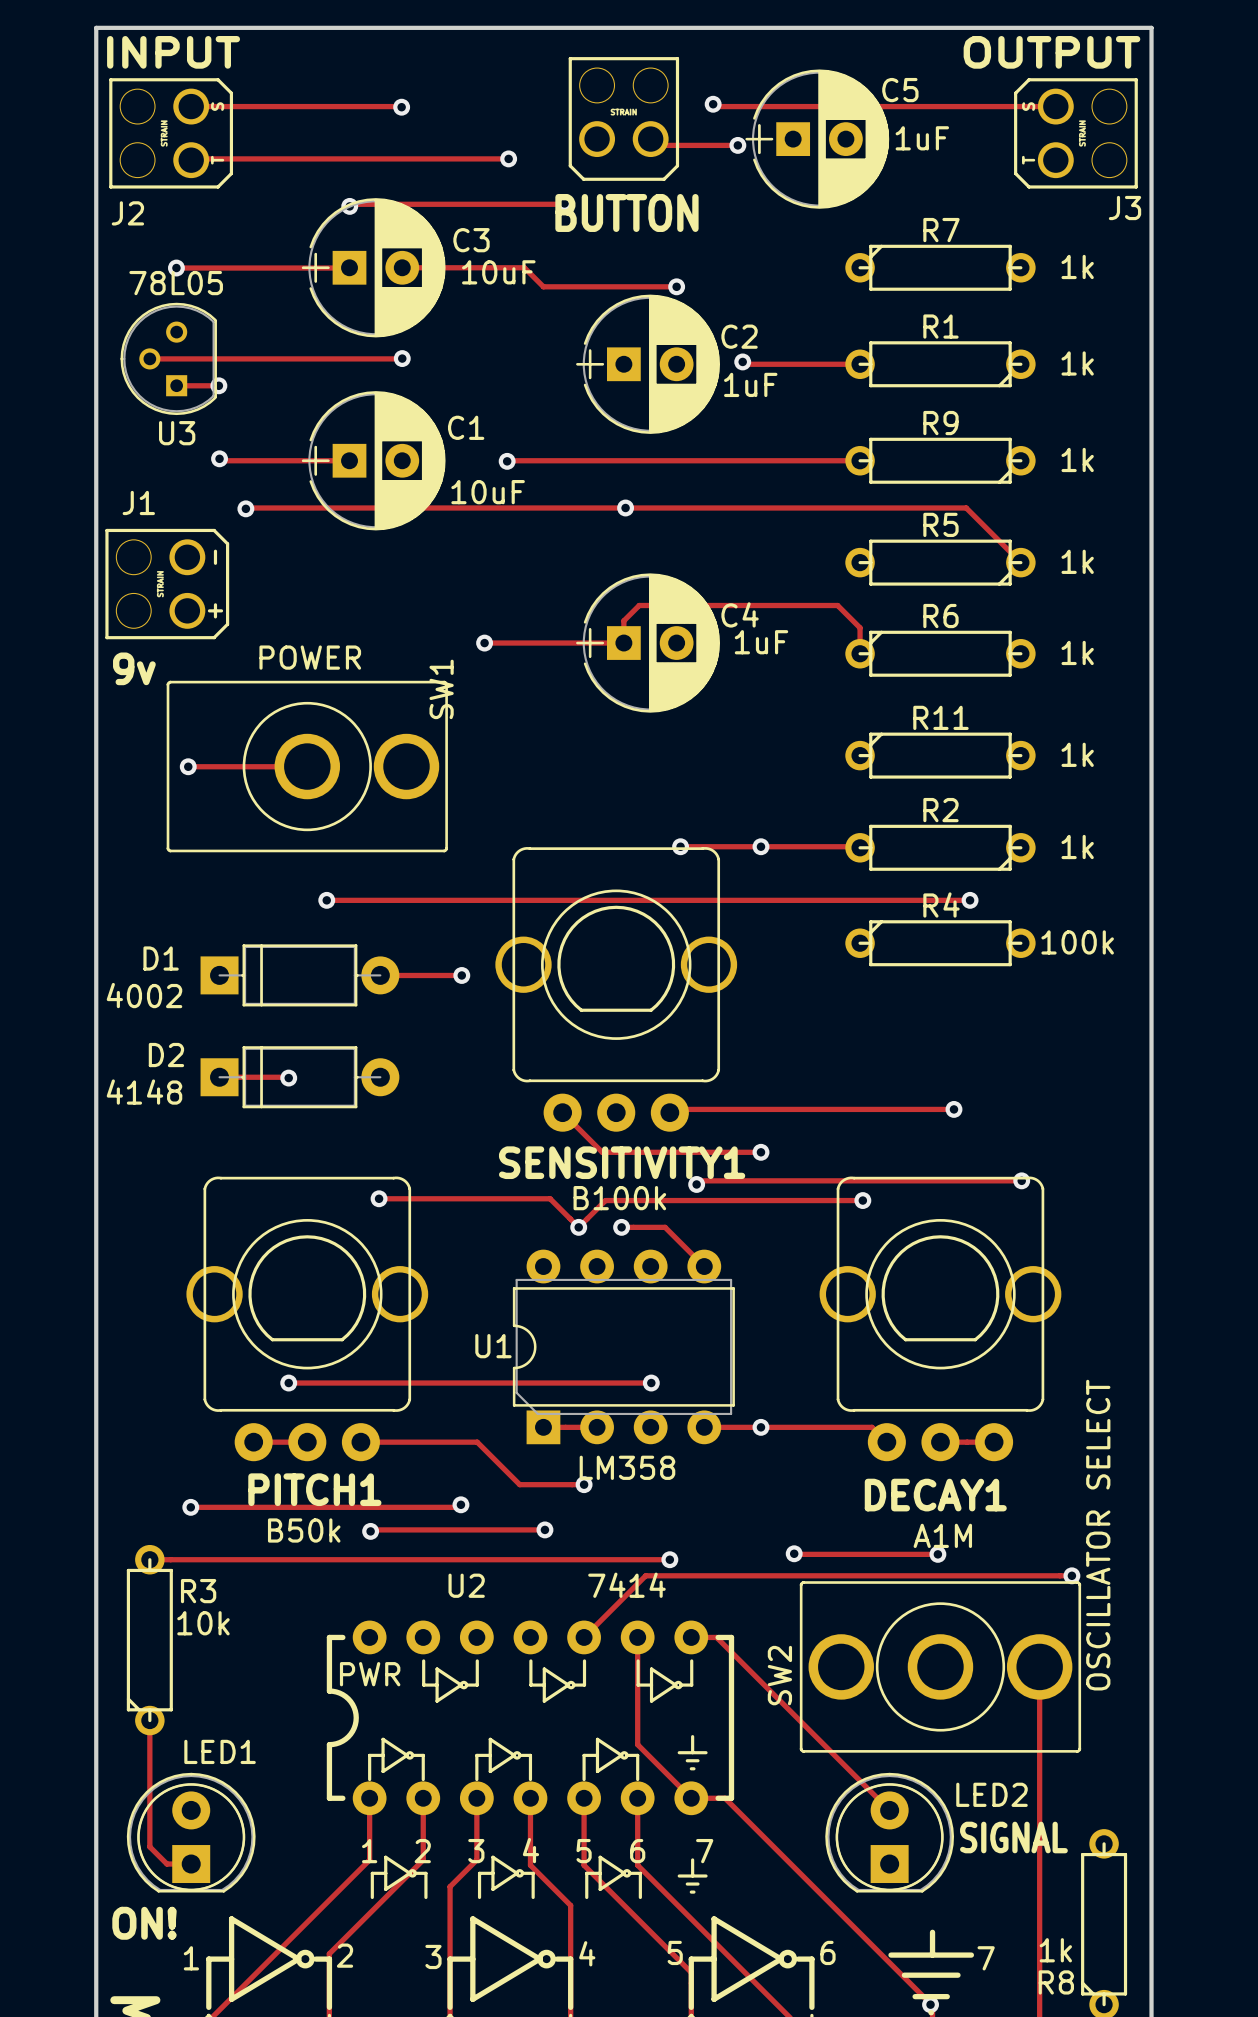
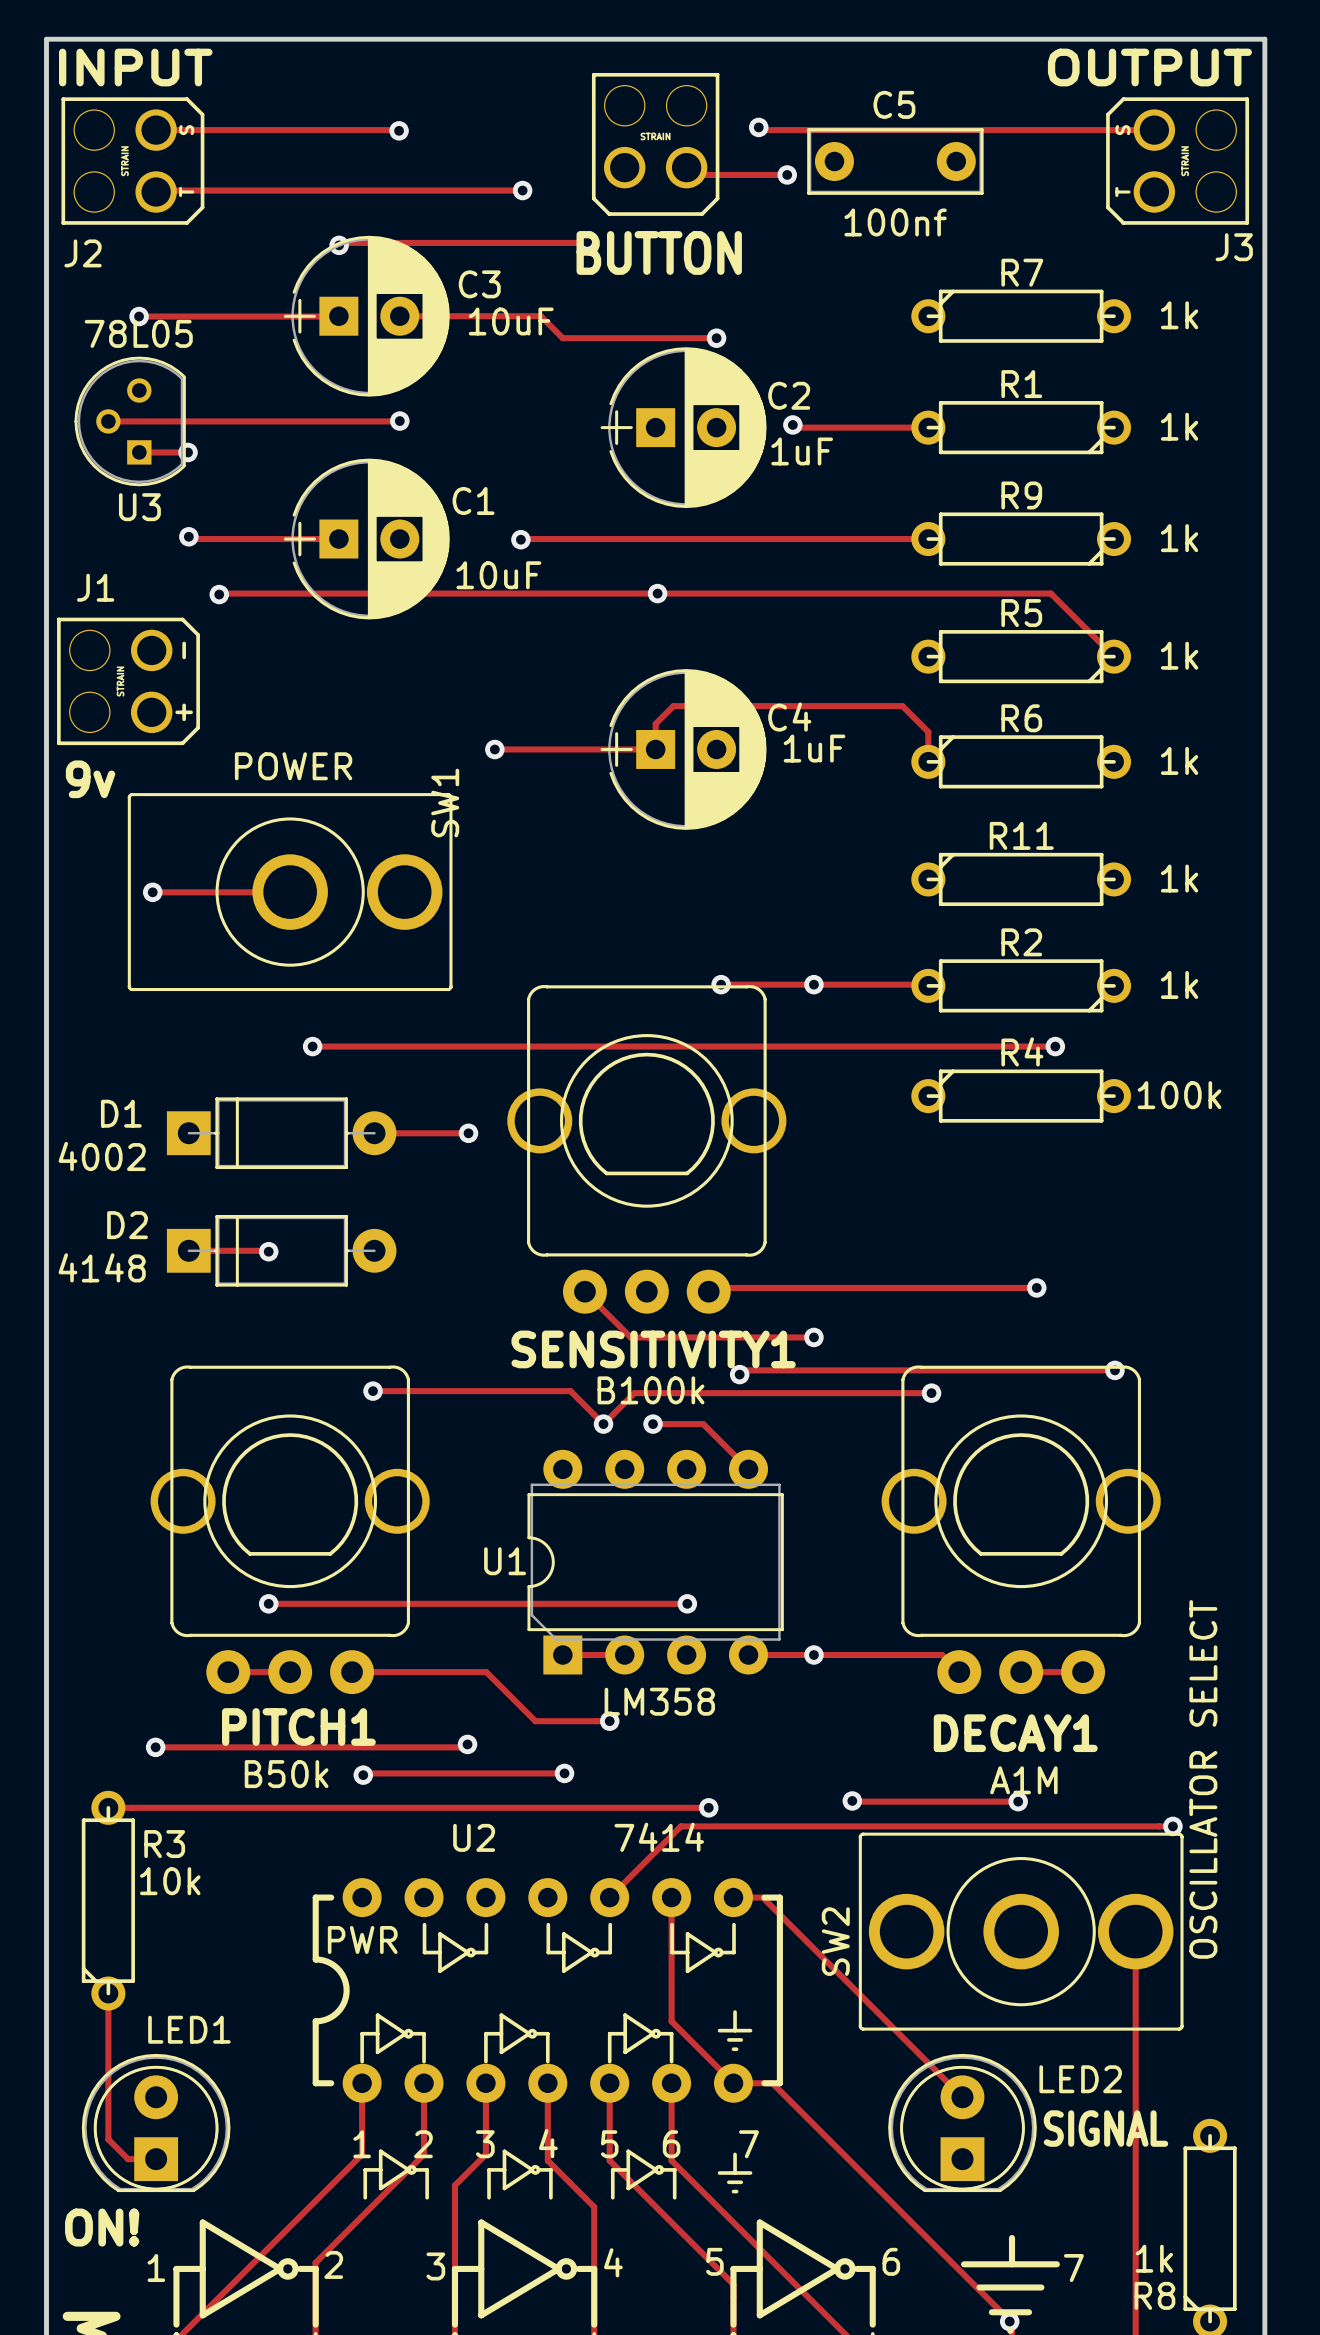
C5 footprint: [745, 69, 890, 209] -> [807, 128, 984, 195]
C5 name position: C5 (900, 90) -> C5 (894, 104)
C5 value: 1uF (922, 138) -> 100nf (895, 222)

